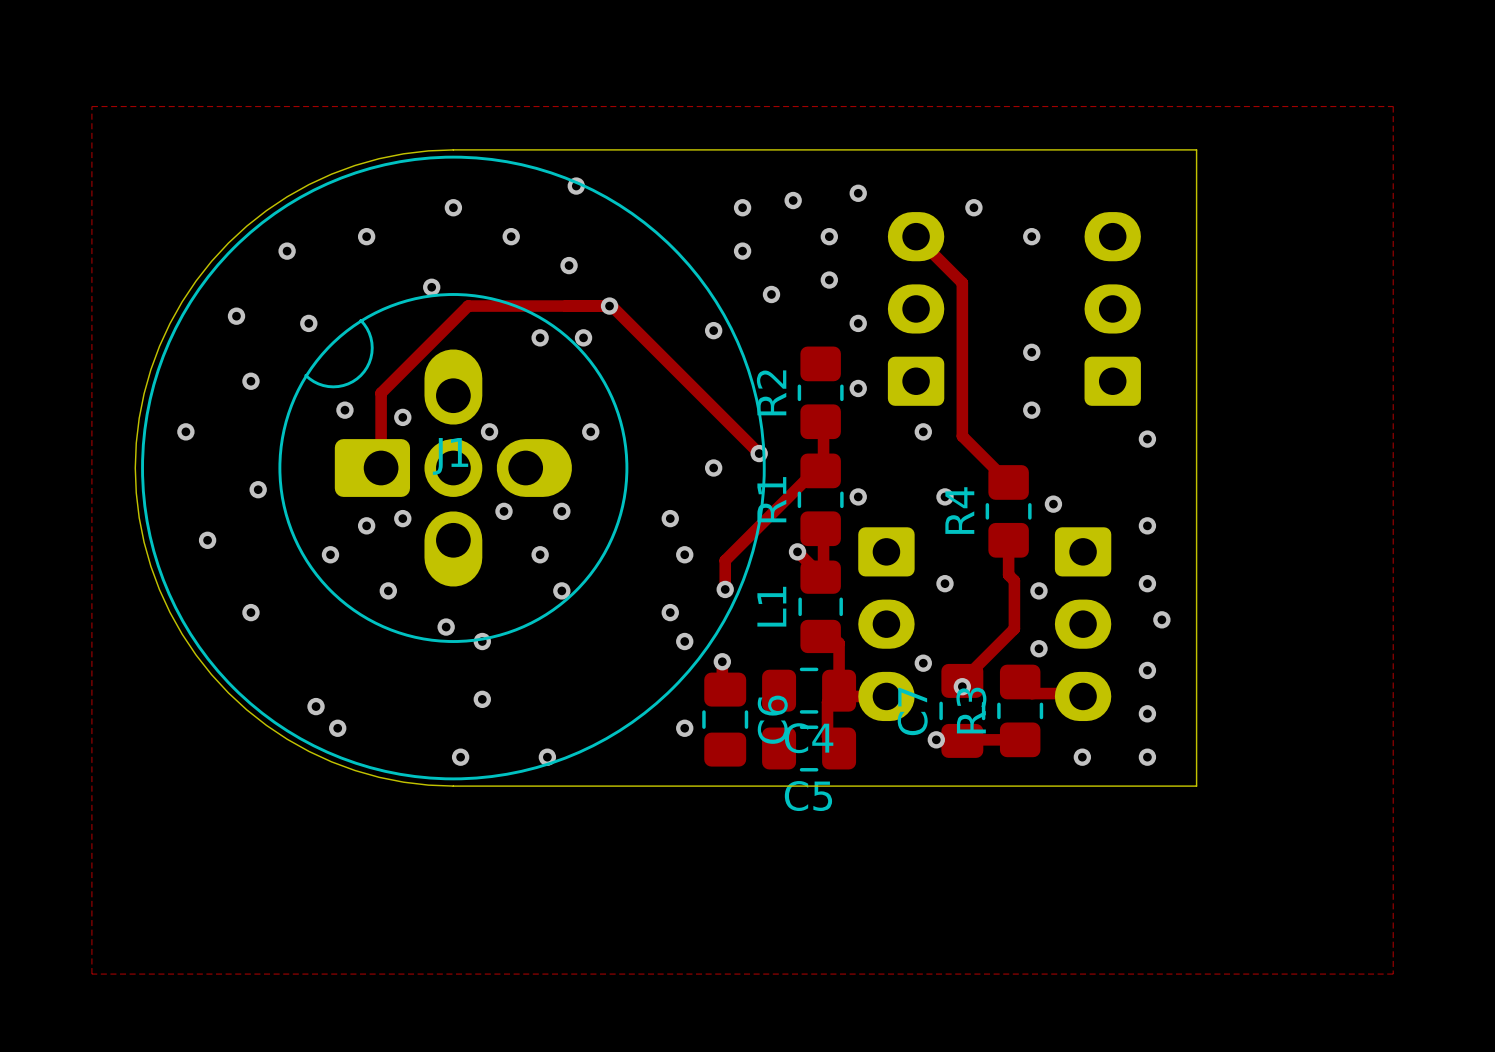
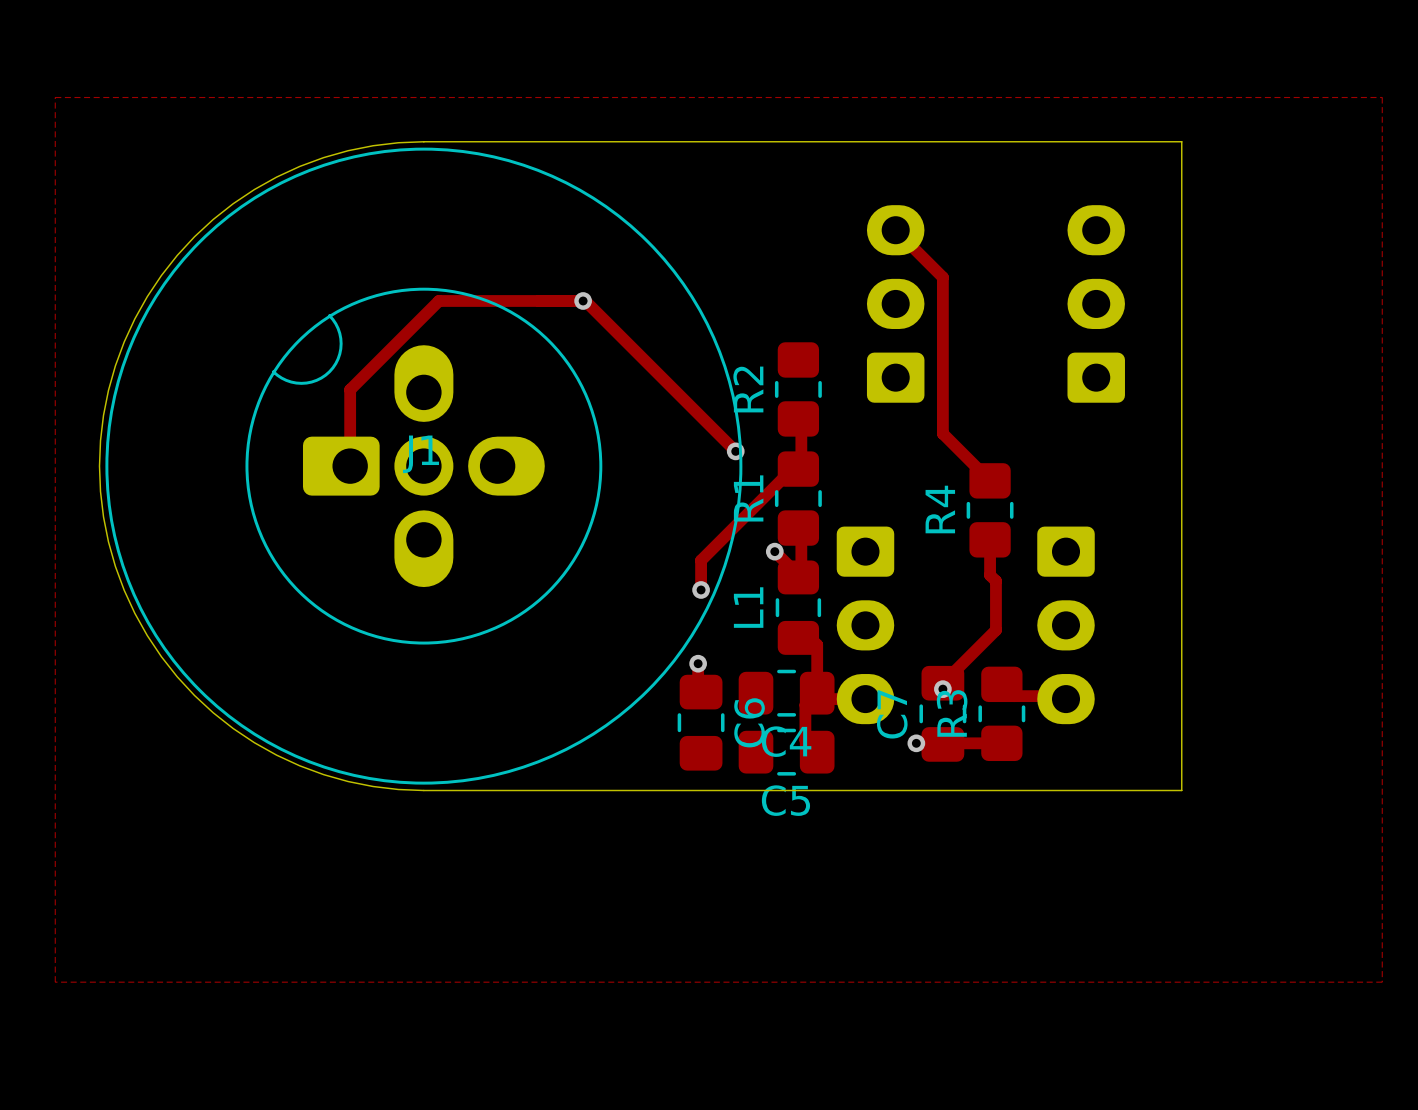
via: (576, 186) -> none
via: (858, 193) -> none
via: (793, 200) -> none
via: (453, 207) -> none
via: (742, 207) -> none
via: (973, 207) -> none
via: (366, 236) -> none
via: (511, 236) -> none
via: (829, 236) -> none
via: (1031, 236) -> none
via: (287, 251) -> none
via: (742, 251) -> none
via: (569, 265) -> none
via: (829, 280) -> none
via: (431, 287) -> none
via: (771, 294) -> none
via: (236, 316) -> none
via: (308, 323) -> none
via: (858, 323) -> none
via: (713, 330) -> none
via: (540, 337) -> none
via: (583, 337) -> none
via: (1031, 352) -> none
via: (250, 381) -> none
via: (858, 388) -> none
via: (344, 410) -> none
via: (1031, 410) -> none
via: (402, 417) -> none
via: (185, 431) -> none
via: (489, 431) -> none
via: (590, 431) -> none
via: (923, 431) -> none
via: (1147, 439) -> none
via: (713, 468) -> none
via: (258, 489) -> none
via: (858, 496) -> none
via: (944, 496) -> none
via: (1053, 504) -> none
via: (504, 511) -> none
via: (561, 511) -> none
via: (402, 518) -> none
via: (670, 518) -> none
via: (366, 525) -> none
via: (1147, 525) -> none
via: (207, 540) -> none
via: (330, 554) -> none
via: (540, 554) -> none
via: (684, 554) -> none
via: (944, 583) -> none
via: (1147, 583) -> none
via: (388, 590) -> none
via: (561, 590) -> none
via: (1038, 590) -> none
via: (250, 612) -> none
via: (670, 612) -> none
via: (1161, 619) -> none
via: (446, 627) -> none
via: (482, 641) -> none
via: (684, 641) -> none
via: (1038, 648) -> none
via: (923, 663) -> none
via: (1147, 670) -> none
via: (482, 699) -> none
via: (316, 706) -> none
via: (1147, 713) -> none
via: (337, 728) -> none
via: (684, 728) -> none
via: (460, 757) -> none
via: (547, 757) -> none
via: (1082, 757) -> none
via: (1147, 757) -> none

